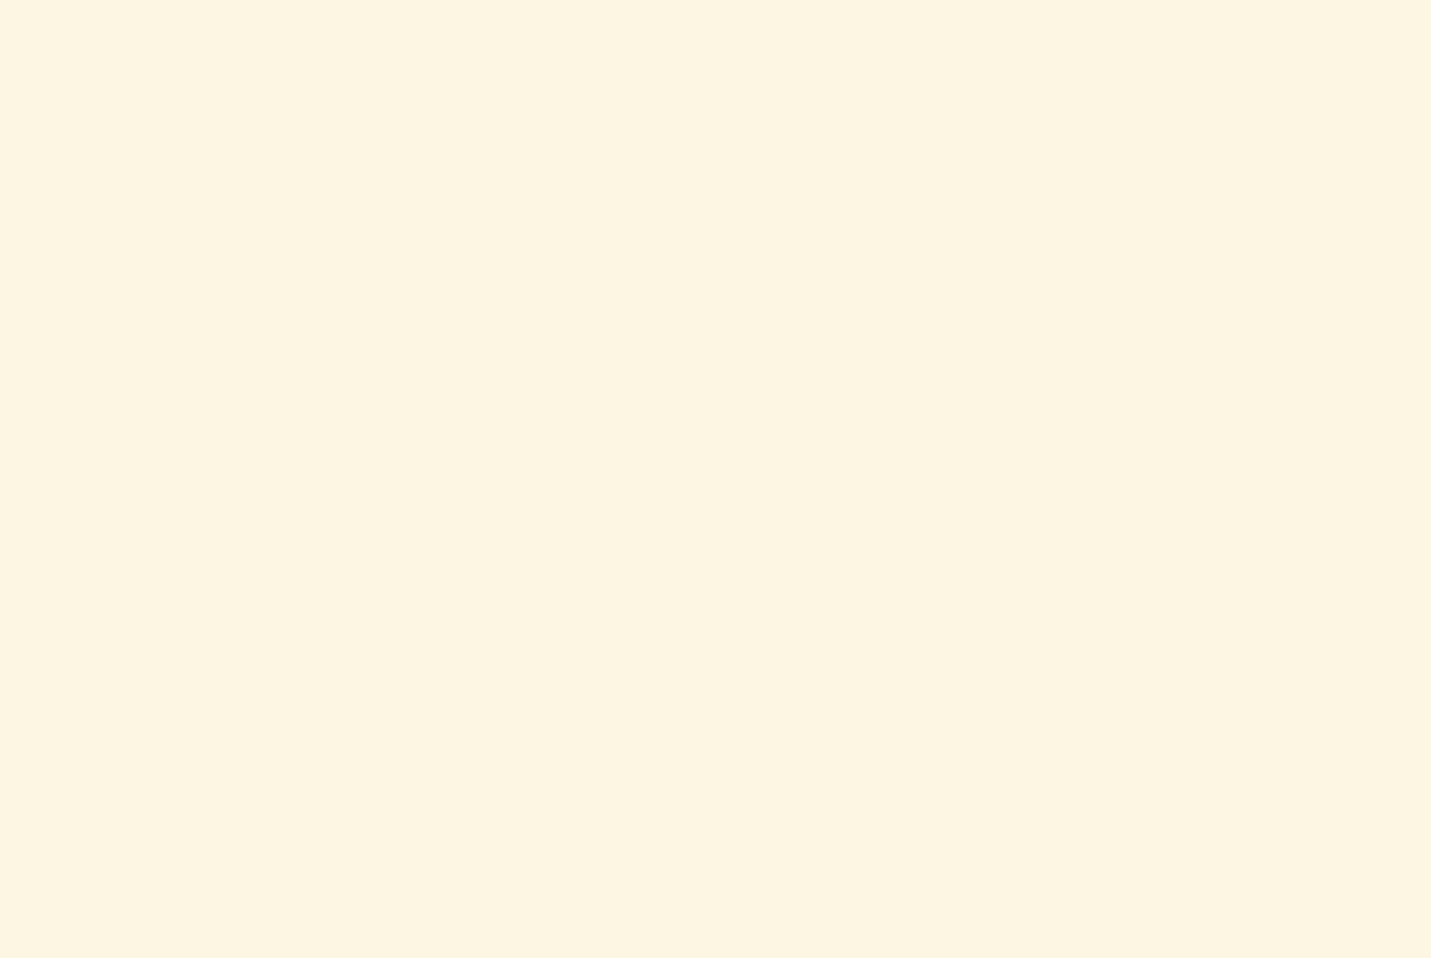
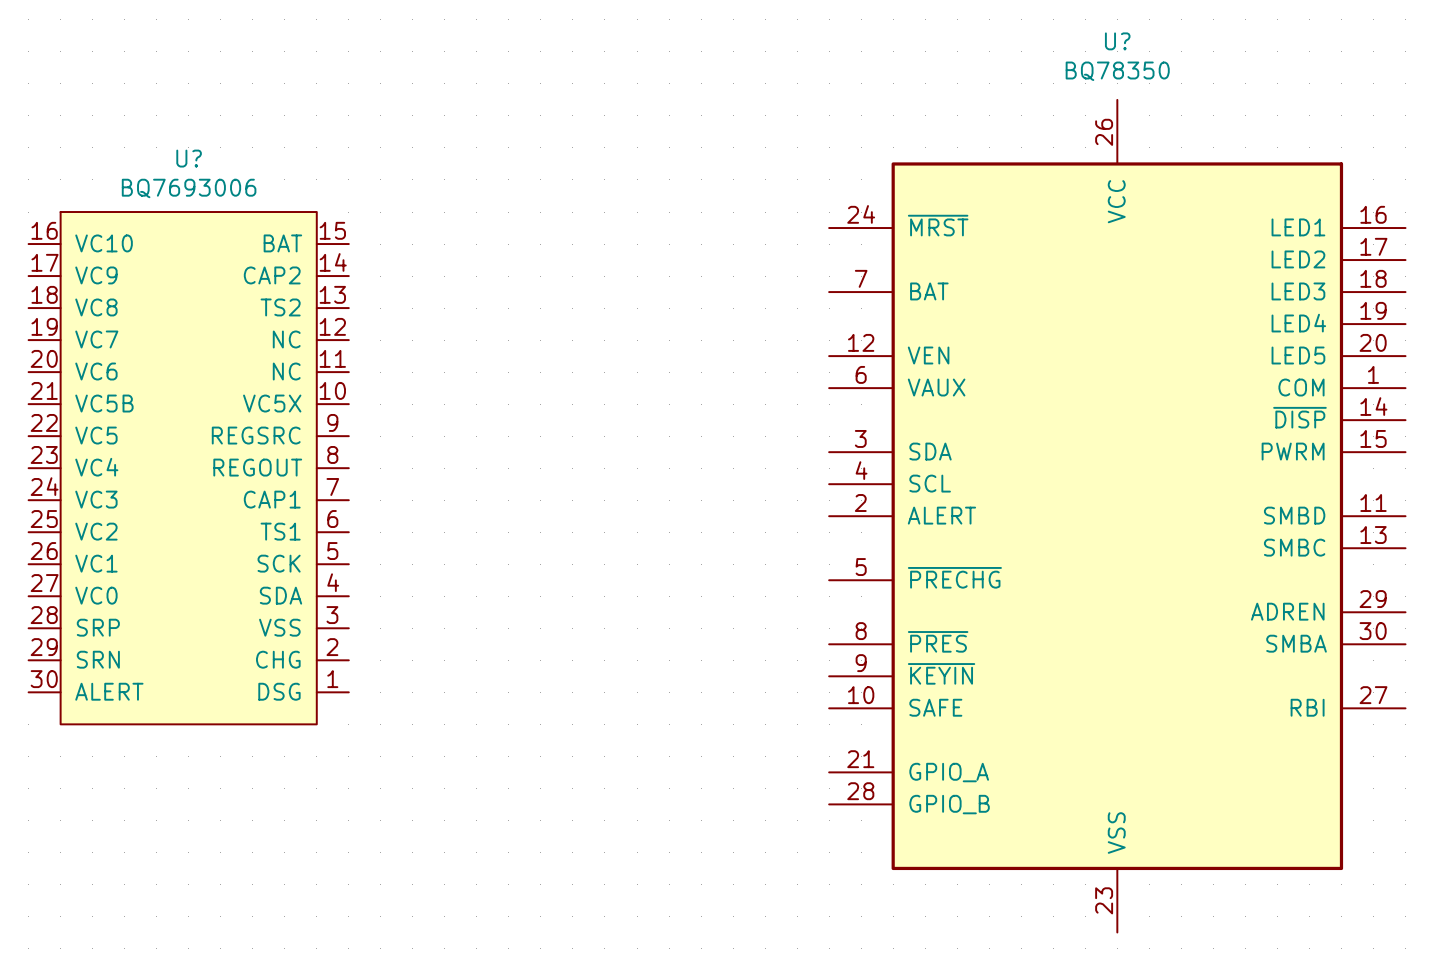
U?: none -> BQ7693006 (188, 468)
U?: none -> BQ78350 (1117, 516)

